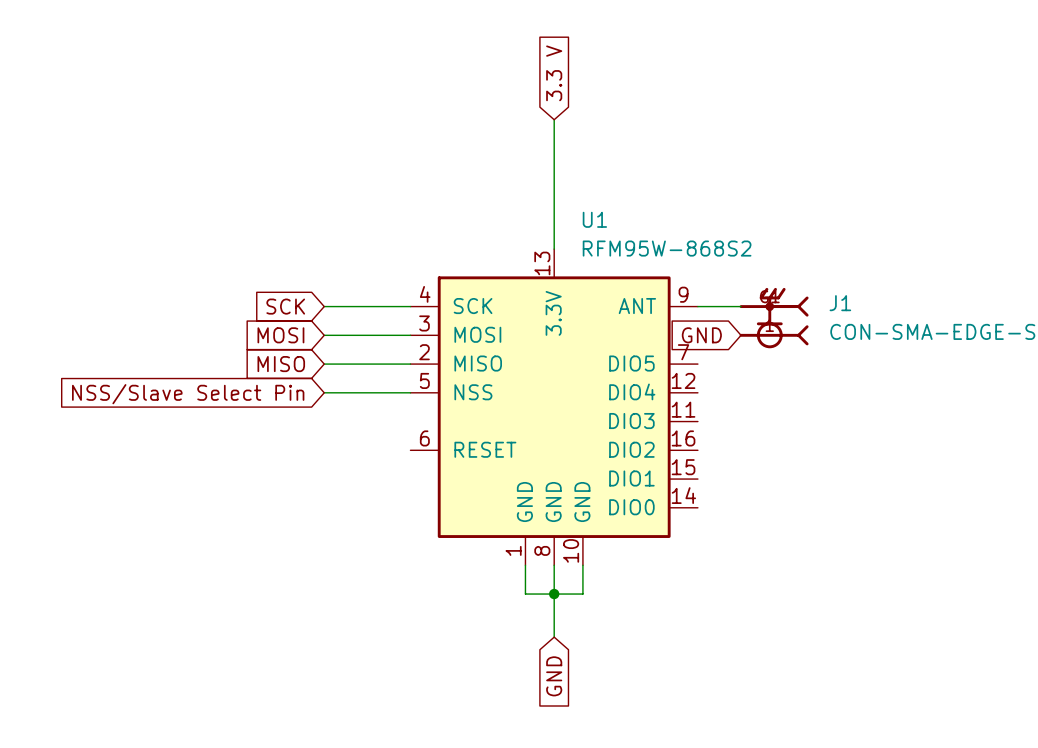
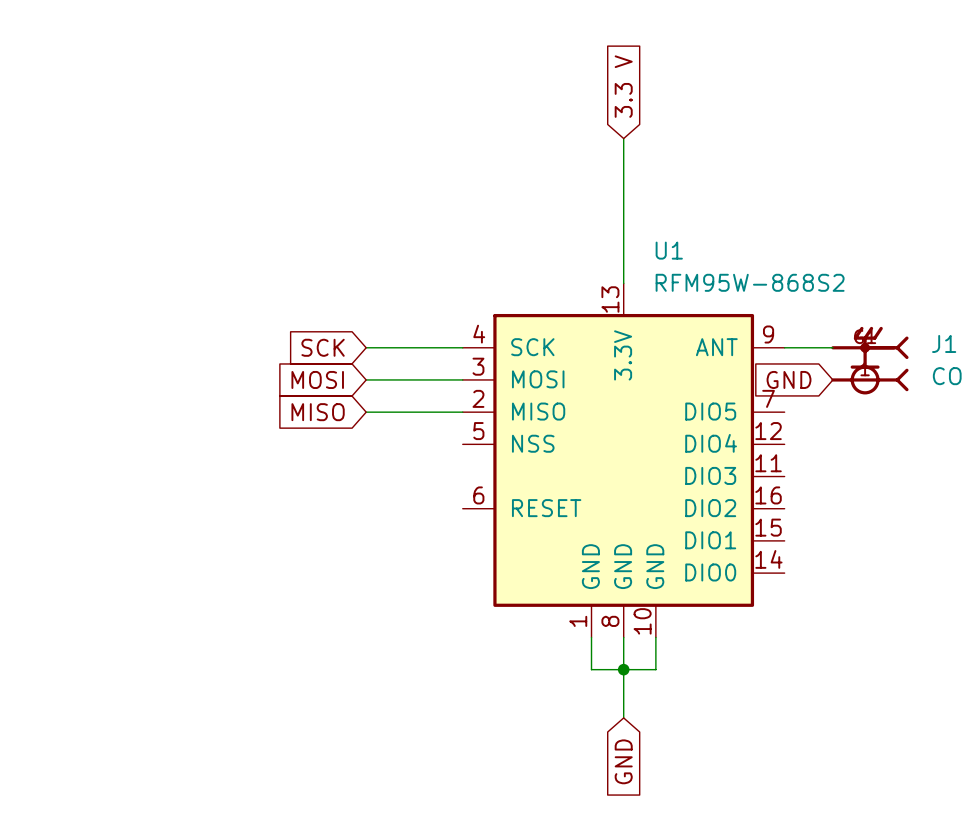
wire: (324, 392) (410, 392) -> none
global label: NSS/Slave Select Pin (188, 394) -> none

